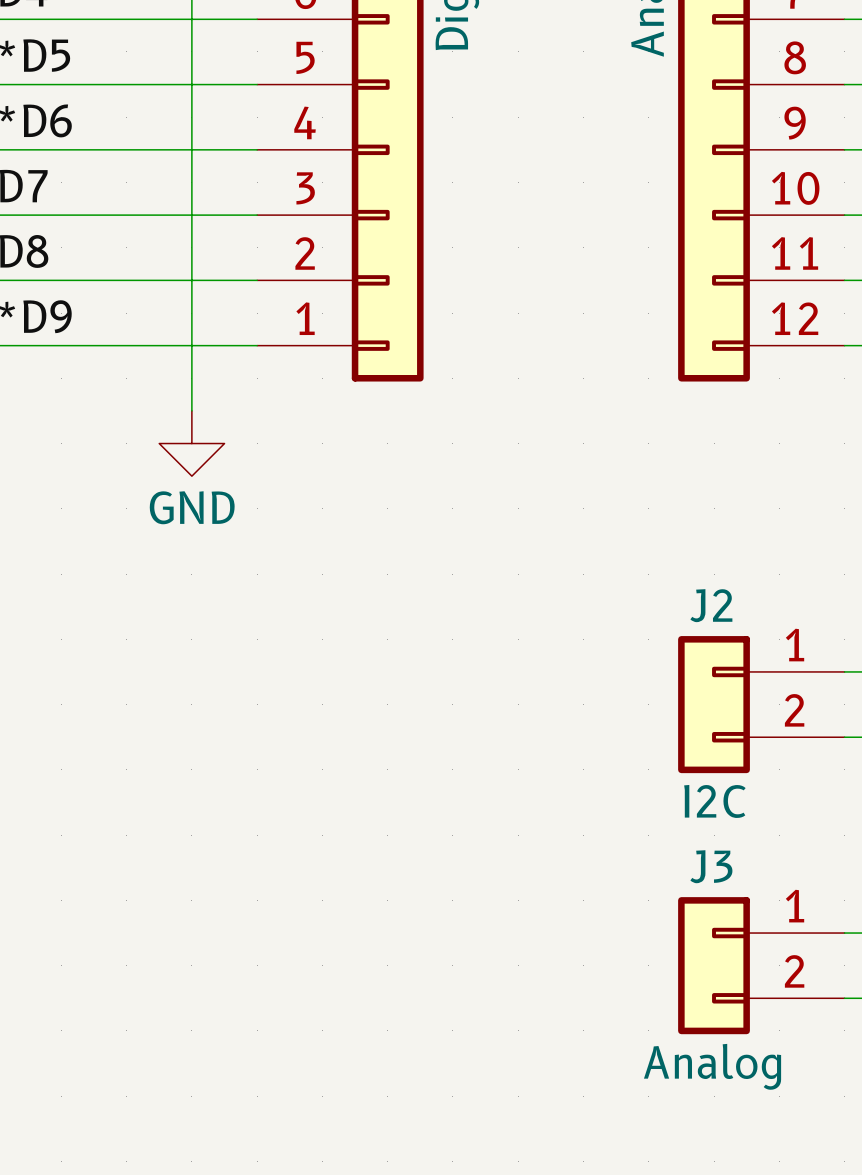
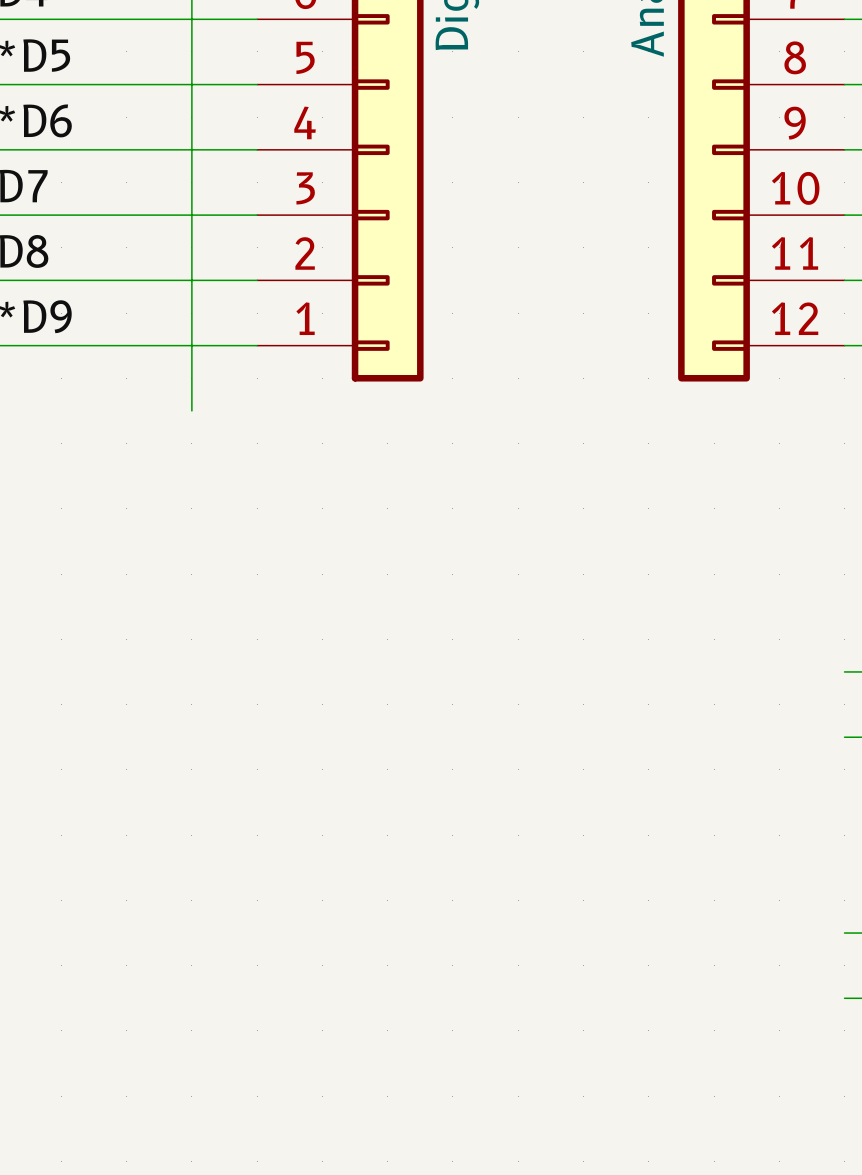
power symbol: GND (191, 443) -> none
J2: I2C (761, 704) -> none
J3: Analog (761, 965) -> none

